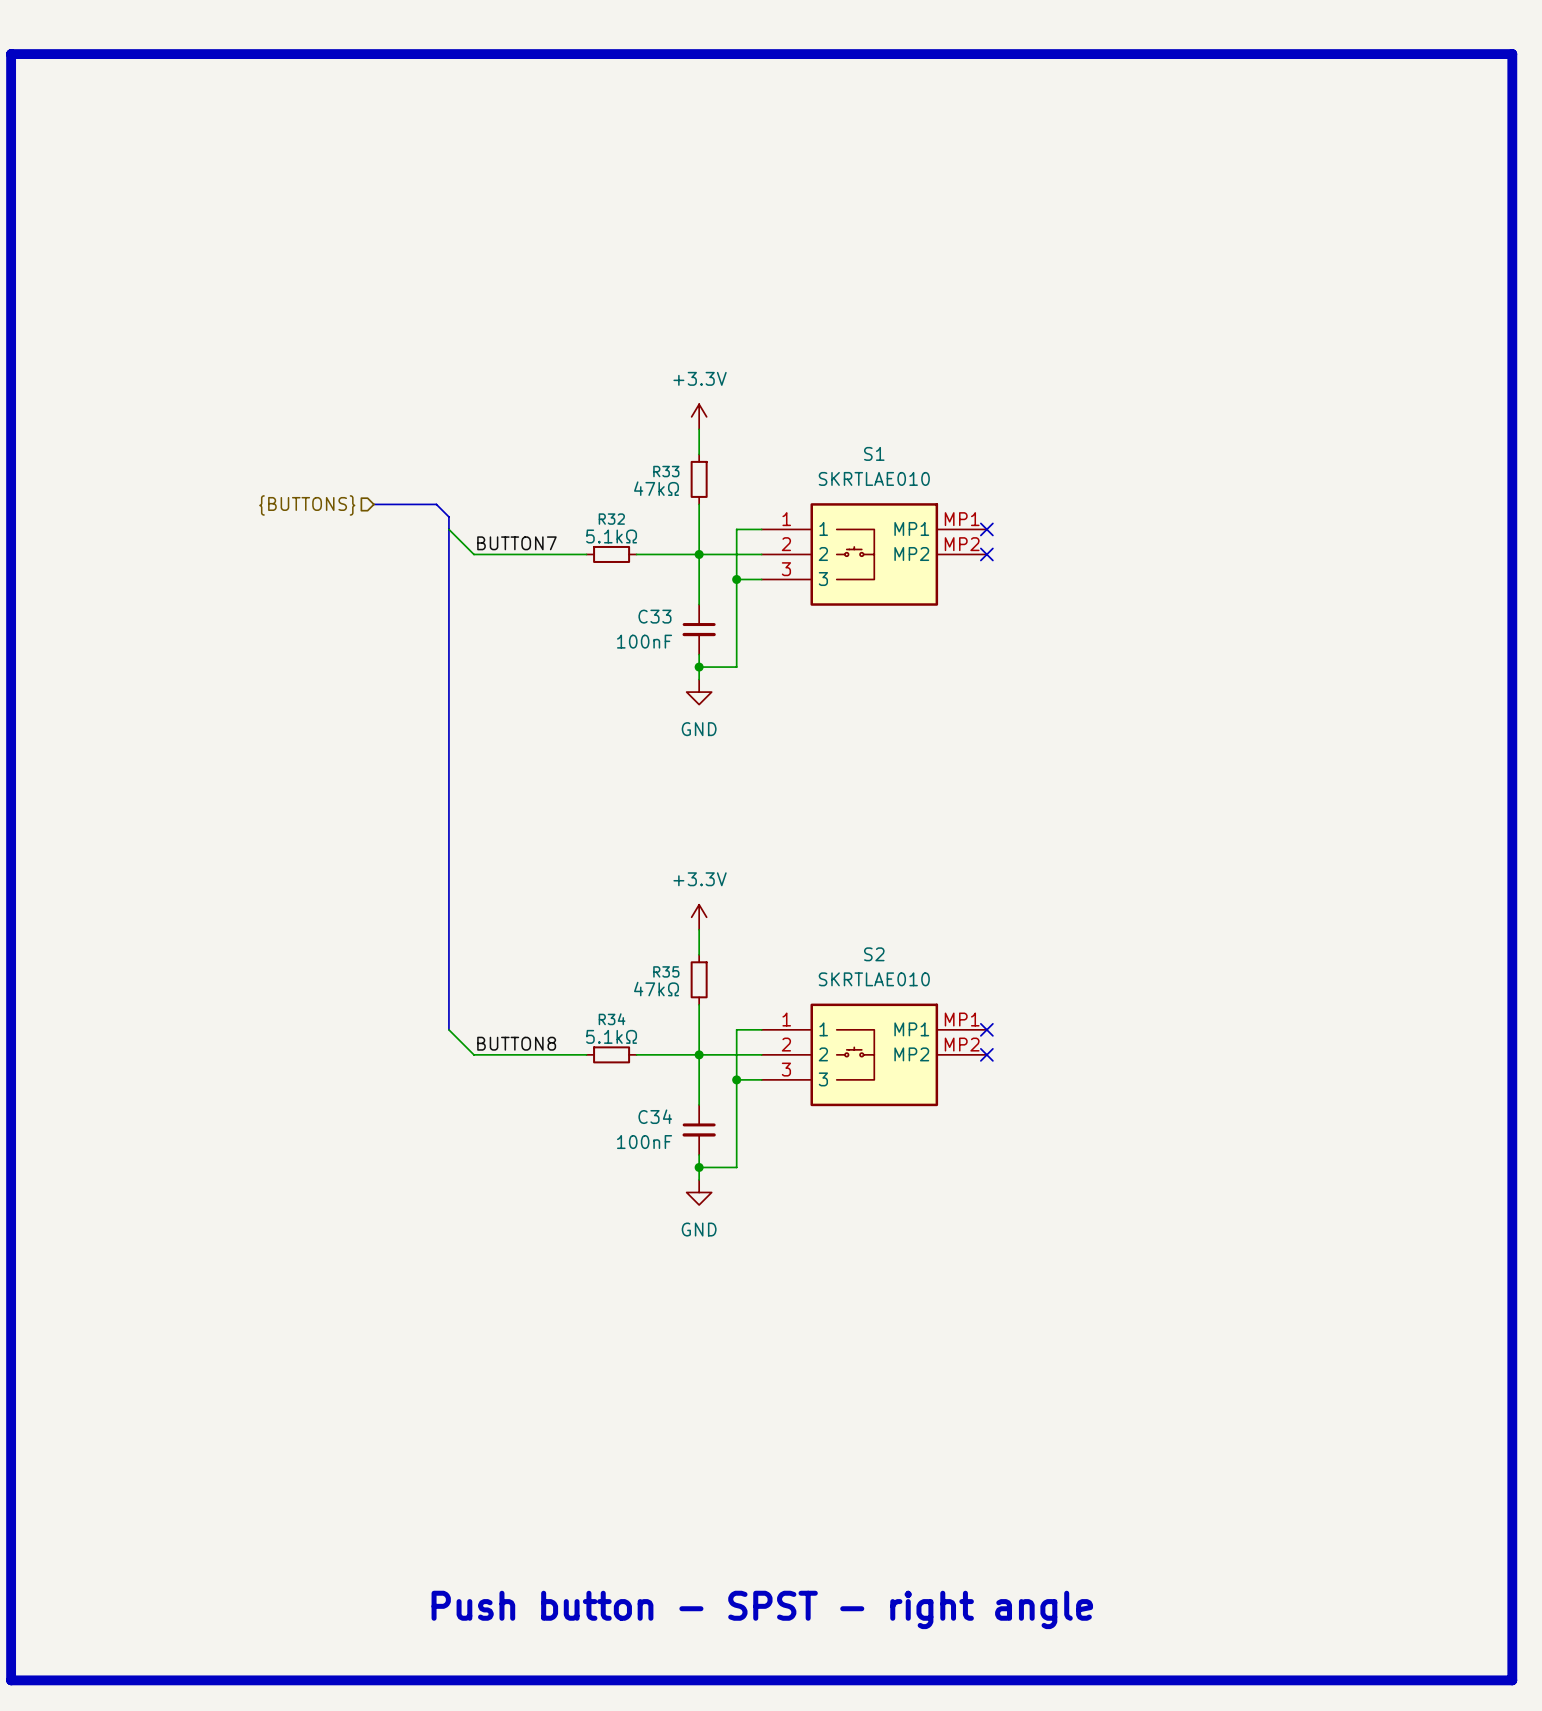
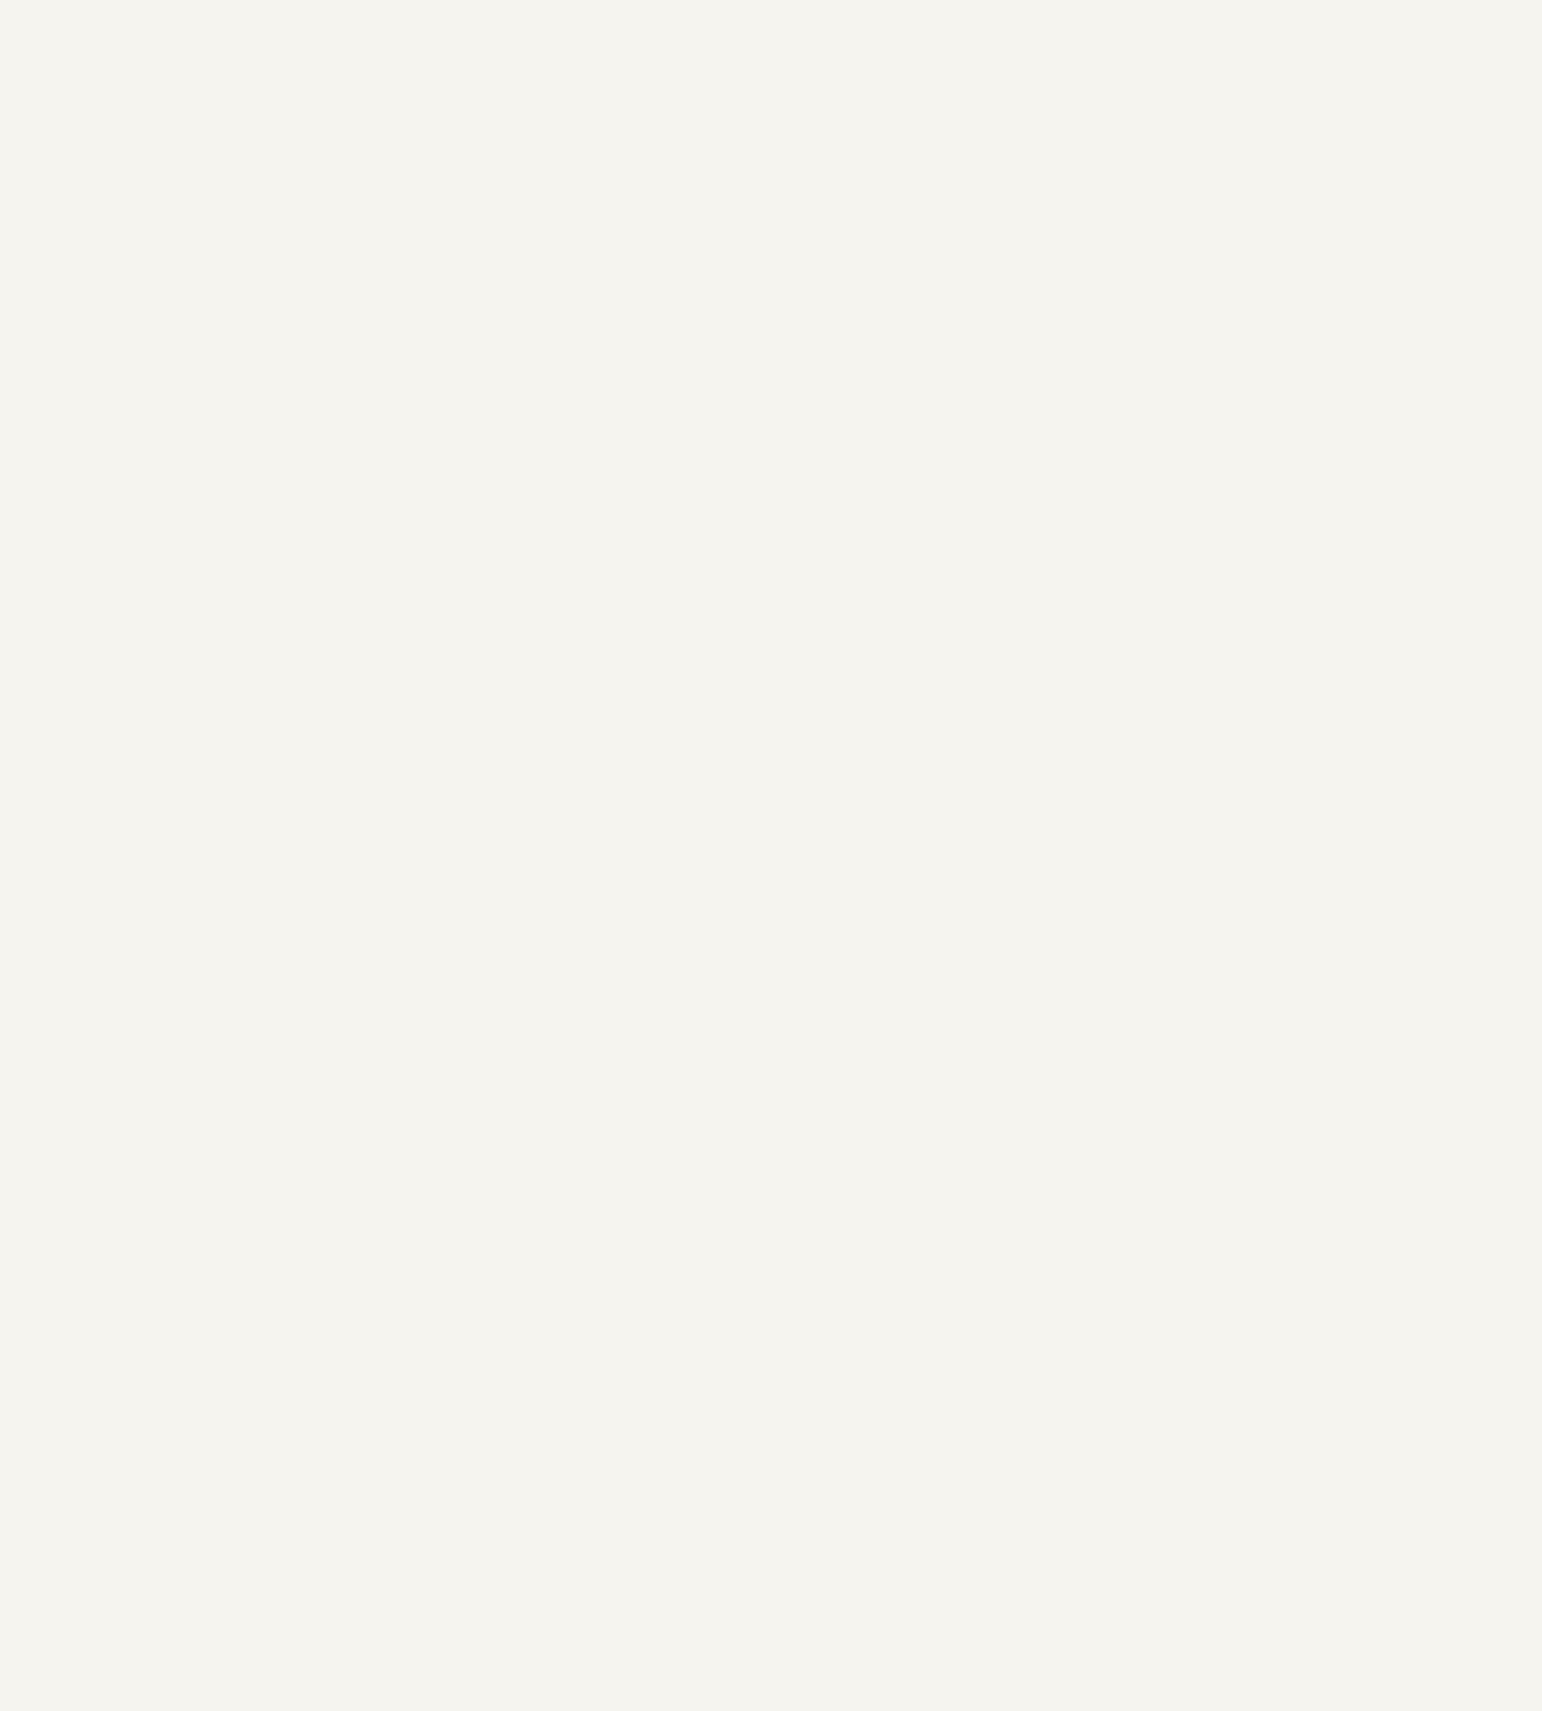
line: (11, 54) (1512, 54) (1512, 1680) (11, 1680) (11, 54) -> none
power symbol: +3.3V (699, 416) -> none
wire: (699, 429) (699, 454) -> none
R33: 47kΩ (699, 479) -> none
bus: (373, 504) (436, 504) (448, 516) (448, 1029) -> none
wire: (699, 504) (699, 604) -> none
hierarchical label: {BUTTONS} (307, 505) -> none
wire: (448, 529) (473, 554) (586, 554) -> none
wire: (761, 529) (736, 529) (736, 667) (699, 667) -> none
no-connect mark: (986, 529) -> none
label: BUTTON7 (516, 543) -> none
R32: 5.1kΩ (611, 554) -> none
wire: (636, 554) (761, 554) -> none
junction: (699, 554) -> none
S1: SKRTLAE010 (874, 554) -> none
no-connect mark: (986, 554) -> none
wire: (736, 579) (761, 579) -> none
junction: (736, 579) -> none
C33: 100nF (699, 629) -> none
wire: (699, 654) (699, 679) -> none
junction: (699, 667) -> none
power symbol: GND (699, 692) -> none
power symbol: +3.3V (699, 917) -> none
wire: (699, 929) (699, 954) -> none
R35: 47kΩ (699, 979) -> none
wire: (699, 1004) (699, 1104) -> none
wire: (448, 1029) (473, 1054) (586, 1054) -> none
wire: (761, 1029) (736, 1029) (736, 1167) (699, 1167) -> none
no-connect mark: (986, 1029) -> none
label: BUTTON8 (516, 1043) -> none
R34: 5.1kΩ (611, 1054) -> none
wire: (636, 1054) (761, 1054) -> none
junction: (699, 1054) -> none
S2: SKRTLAE010 (874, 1054) -> none
no-connect mark: (986, 1054) -> none
wire: (736, 1079) (761, 1079) -> none
junction: (736, 1079) -> none
C34: 100nF (699, 1129) -> none
wire: (699, 1154) (699, 1179) -> none
junction: (699, 1167) -> none
power symbol: GND (699, 1192) -> none
text: Push button - SPST - right angle (762, 1609) -> none

